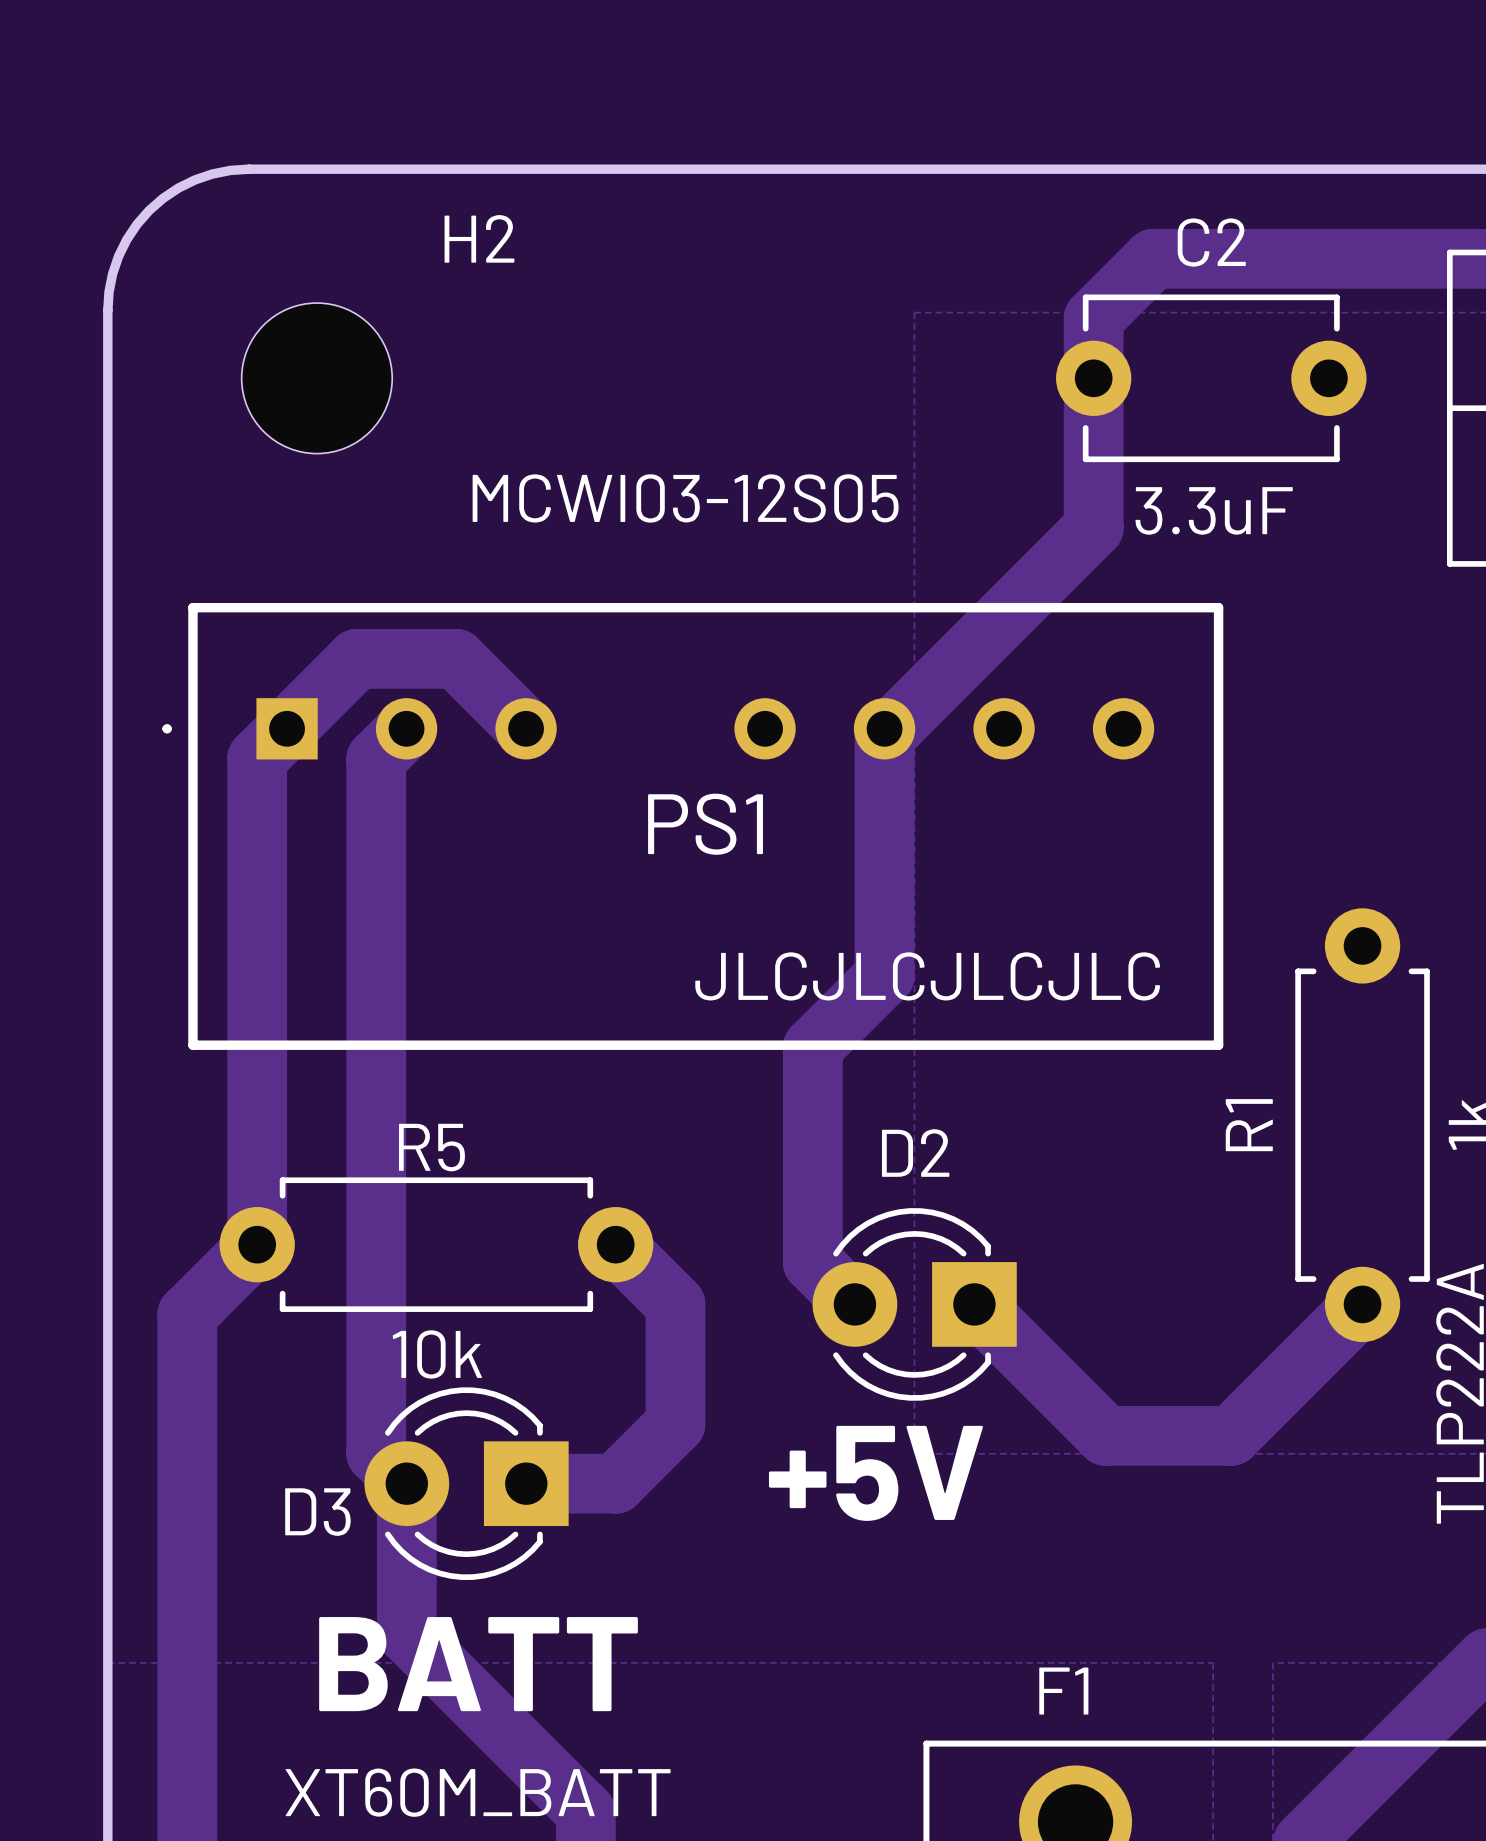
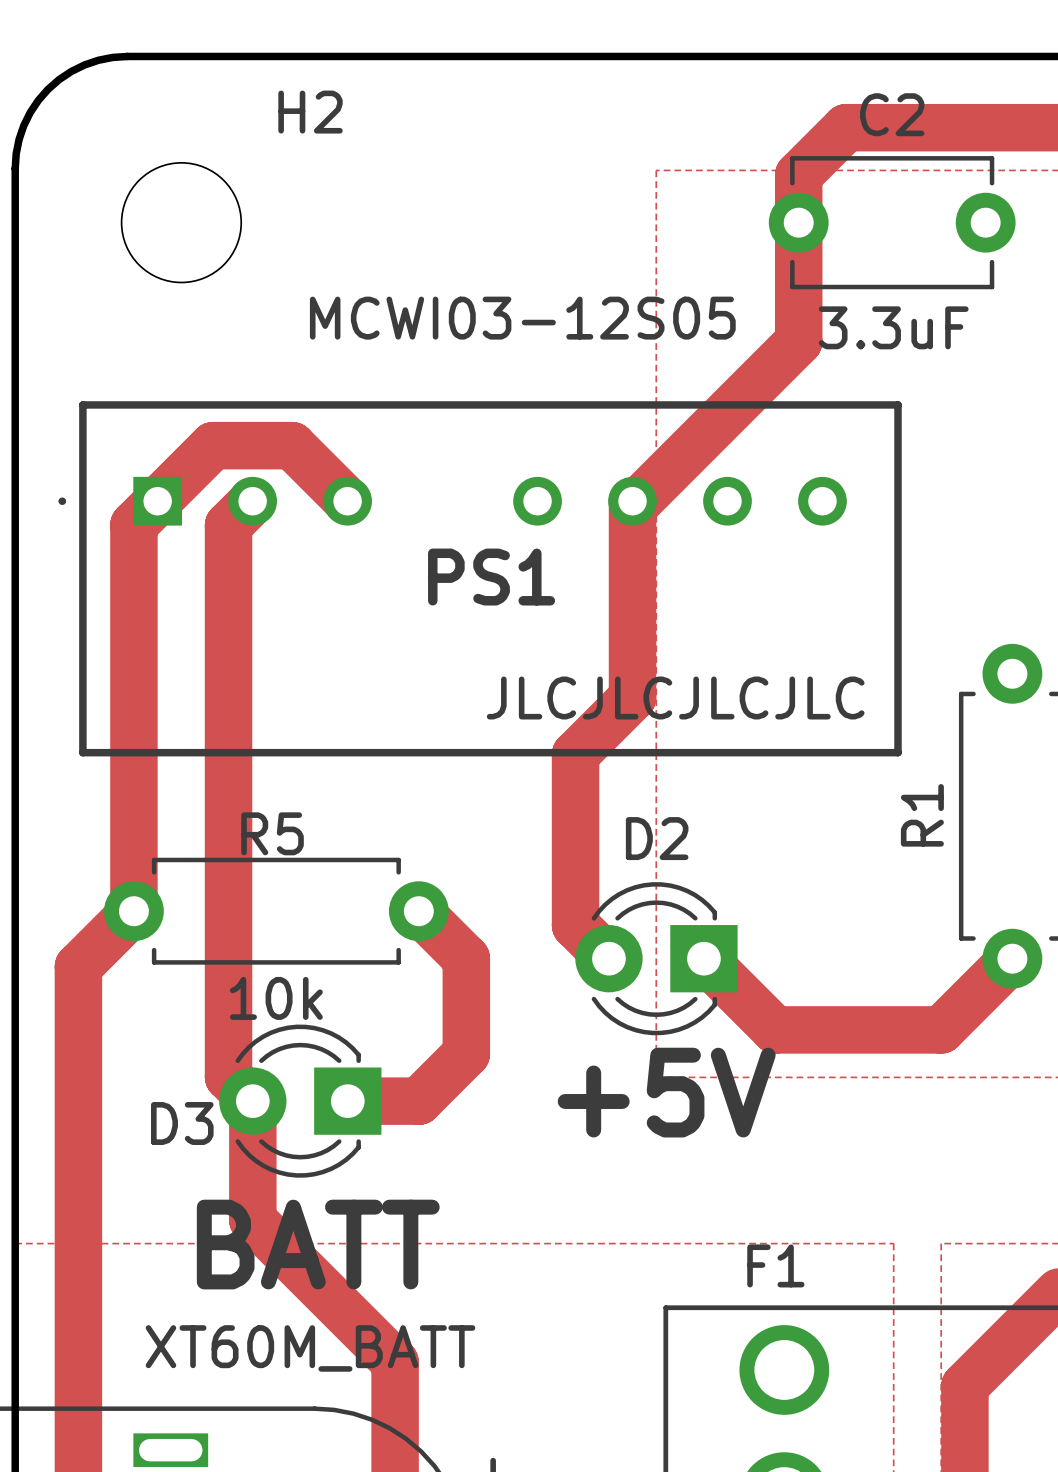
track: (1064, 1394) (1105, 1435) (1231, 1435) (1272, 1394) -> (775, 1029) (941, 1029)

